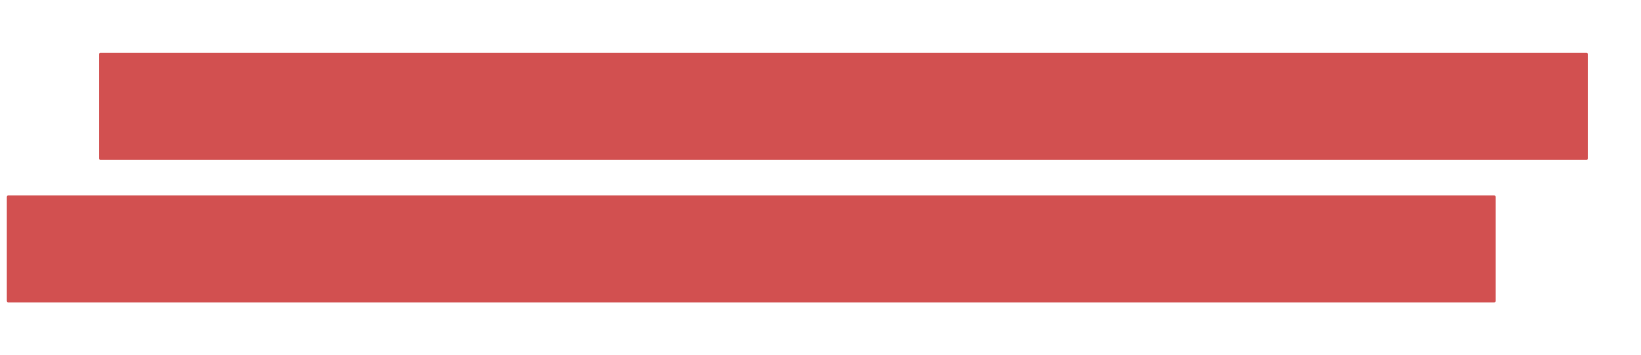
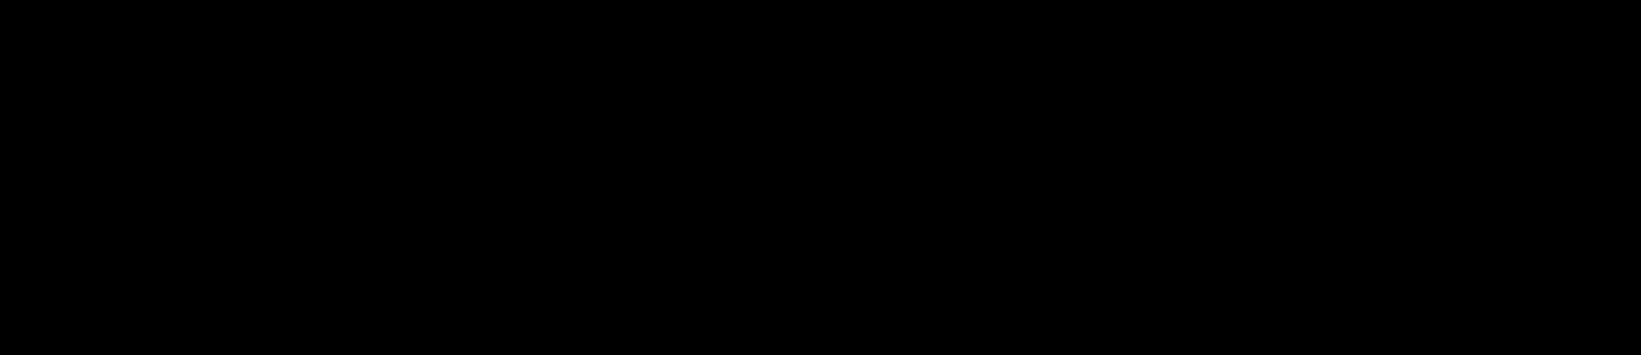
drawing: [99, 52, 1588, 160] -> none
drawing: [6, 195, 1496, 303] -> none

